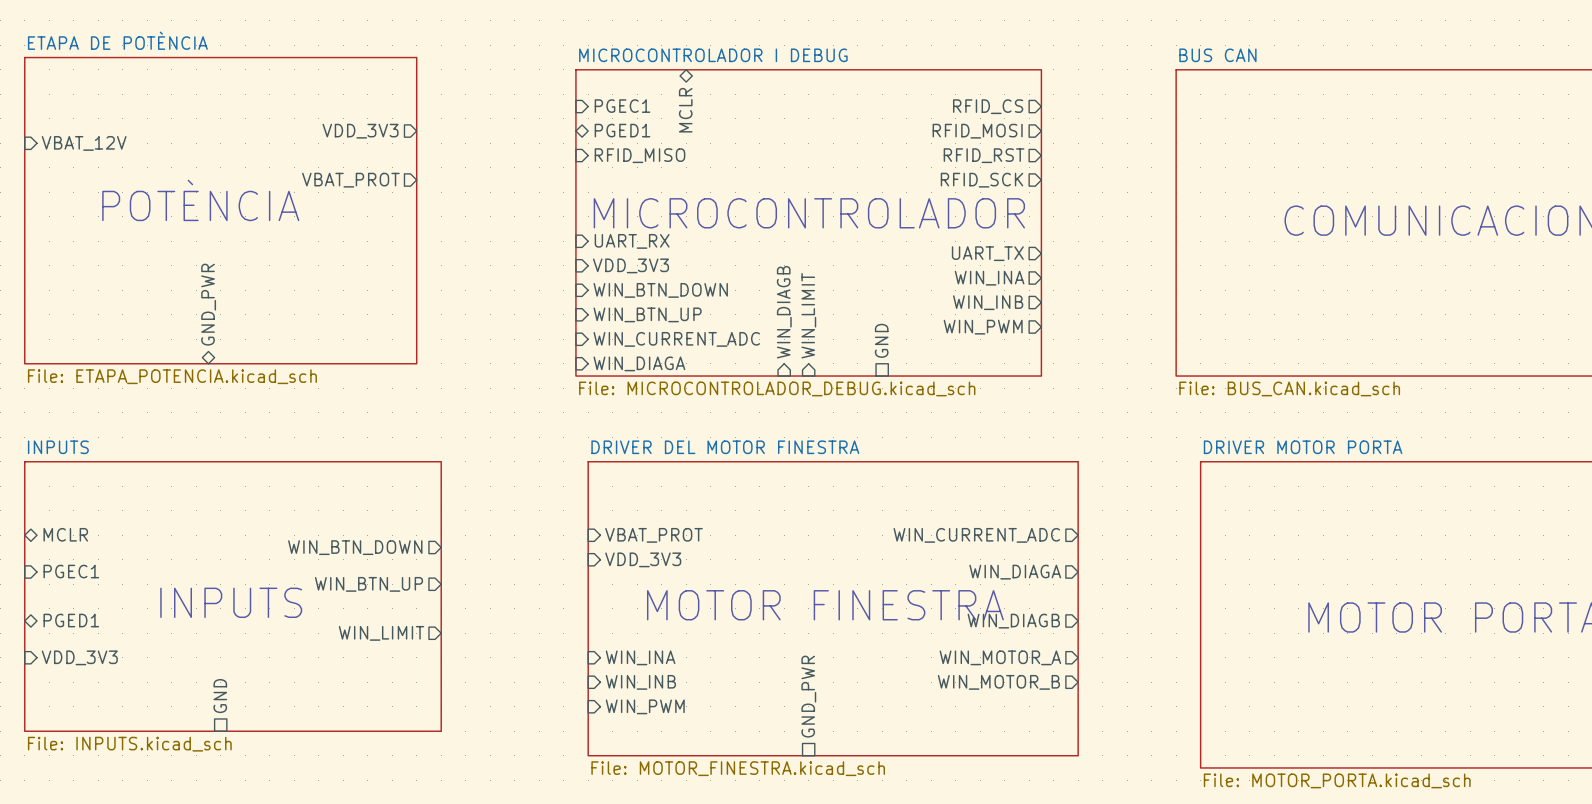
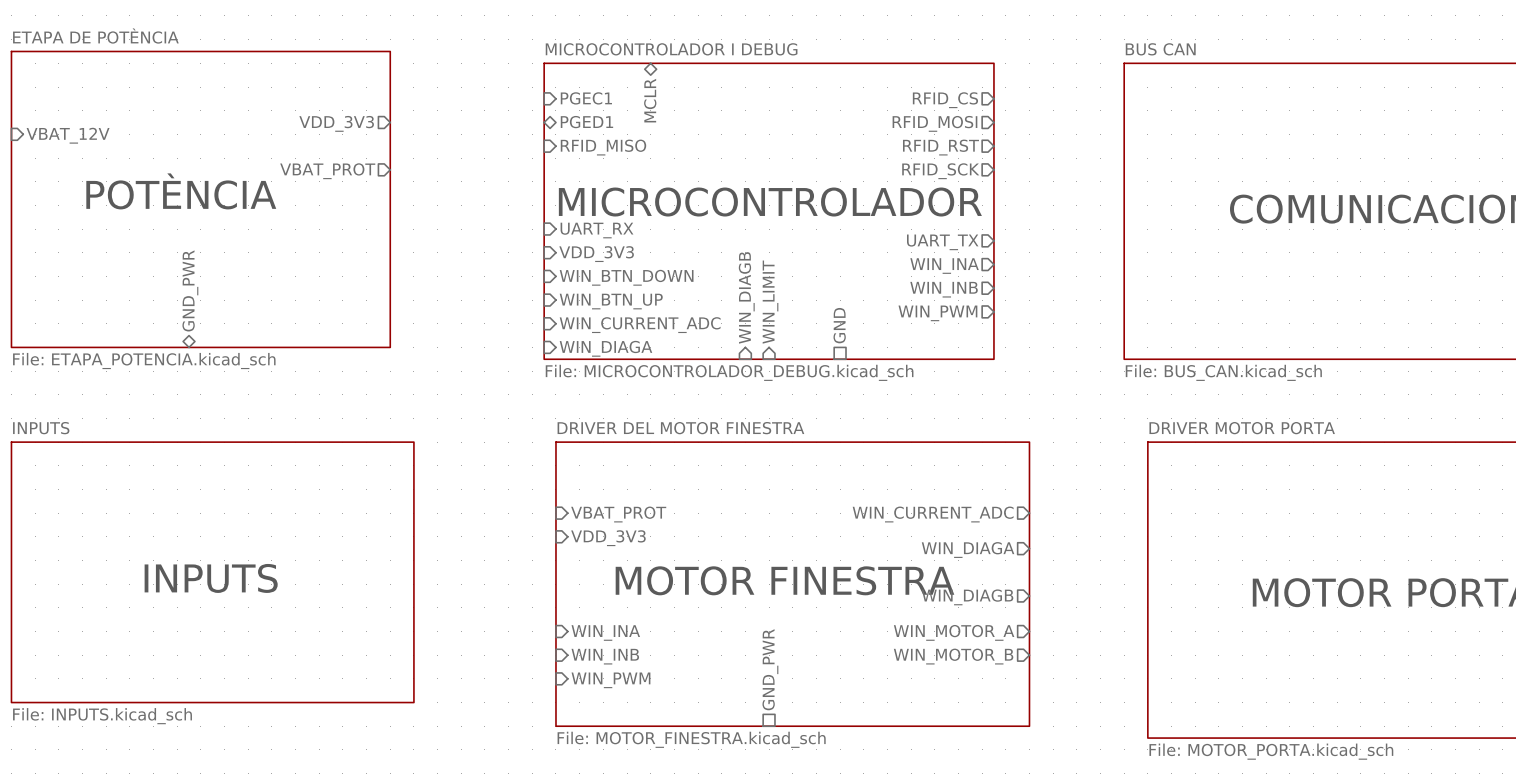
sheet pin: MCLR (65, 534) -> none
sheet pin: WIN_BTN_DOWN (355, 547) -> none
sheet pin: PGEC1 (71, 571) -> none
sheet pin: WIN_BTN_UP (368, 584) -> none
sheet pin: PGED1 (71, 620) -> none
sheet pin: WIN_LIMIT (381, 633) -> none
sheet pin: VDD_3V3 (79, 657) -> none
sheet pin: GND (220, 696) -> none

